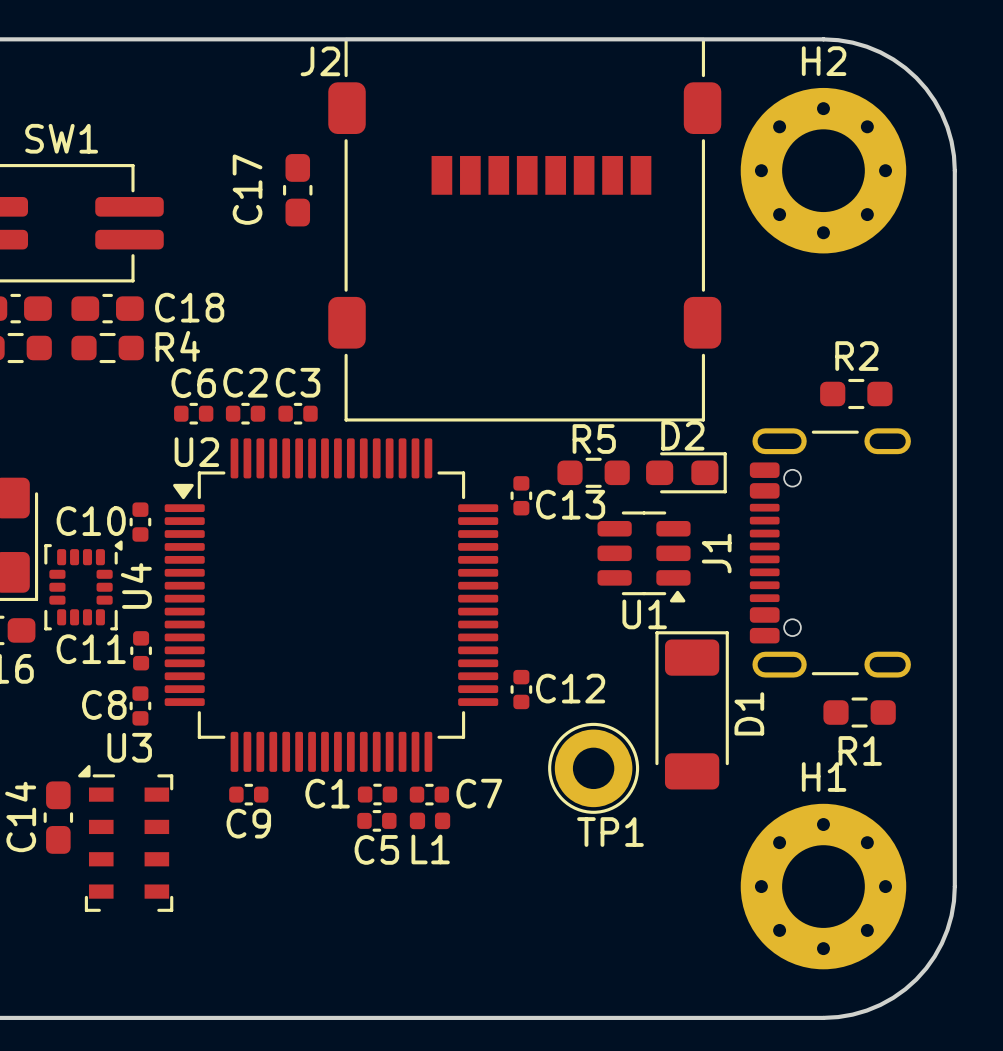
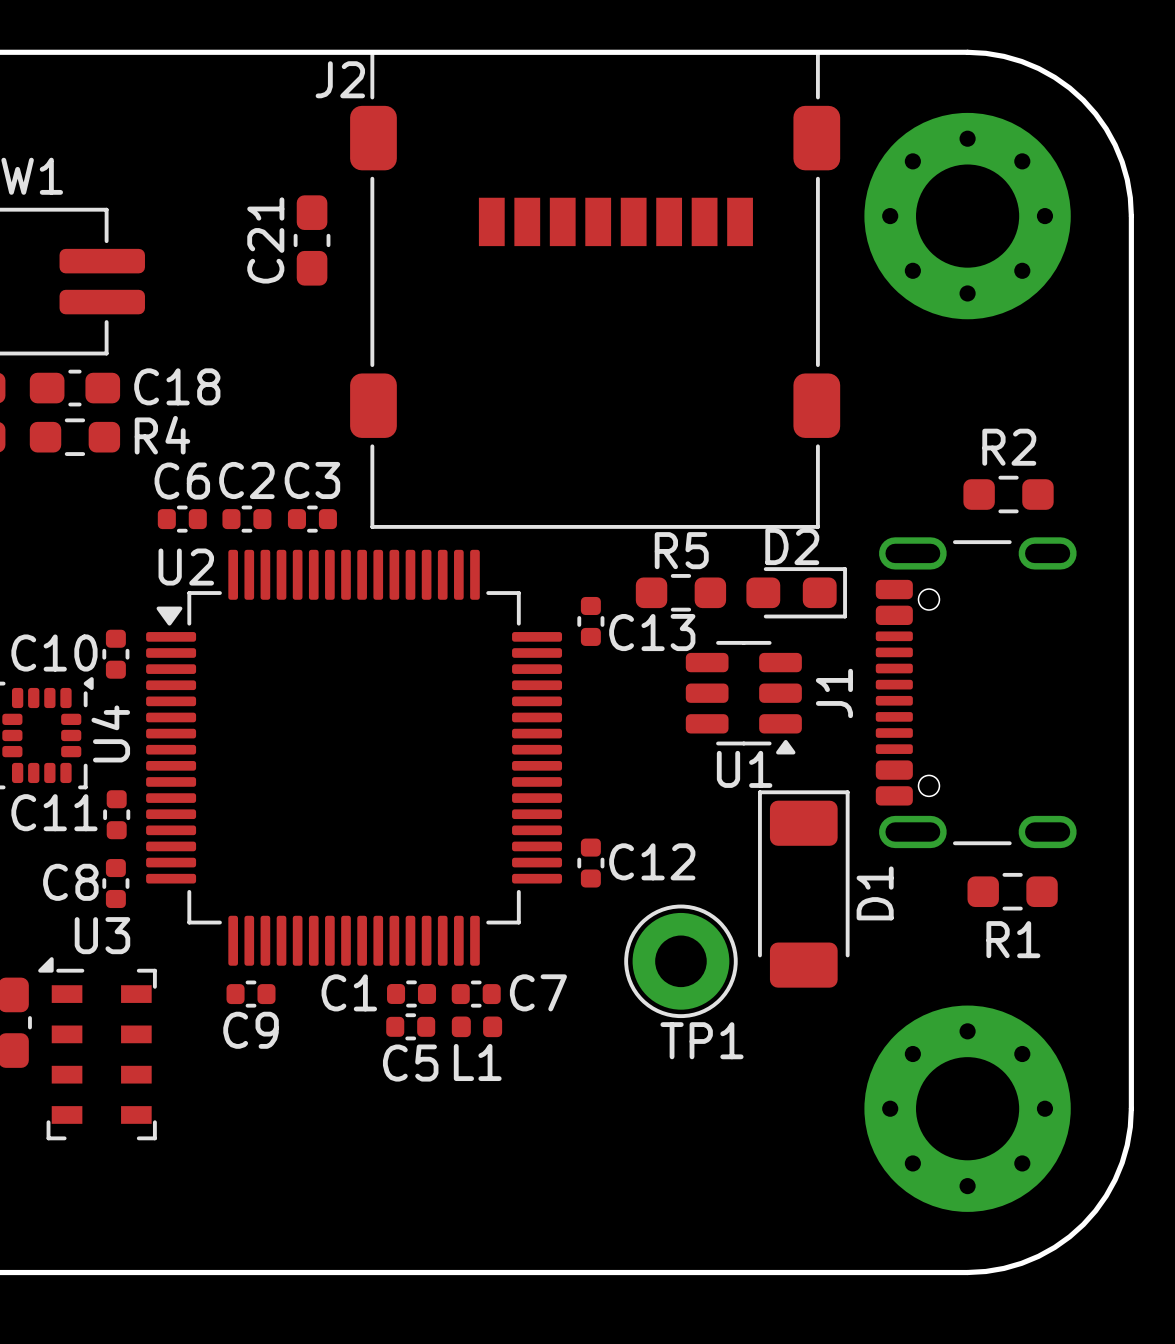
H2 name: H2 (824, 61) -> none
C17 name: C17 (247, 189) -> C21 (265, 240)
H1 name: H1 (824, 777) -> none

